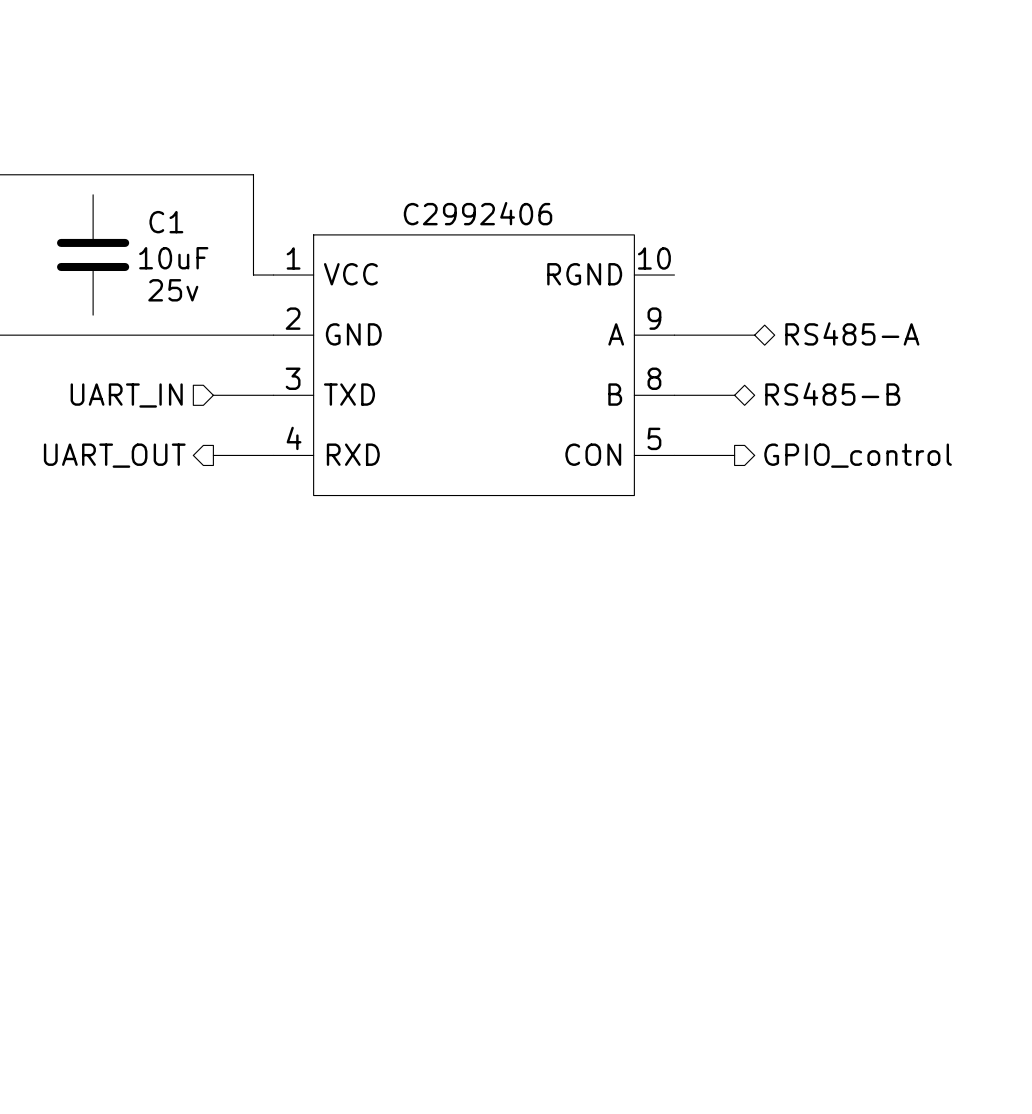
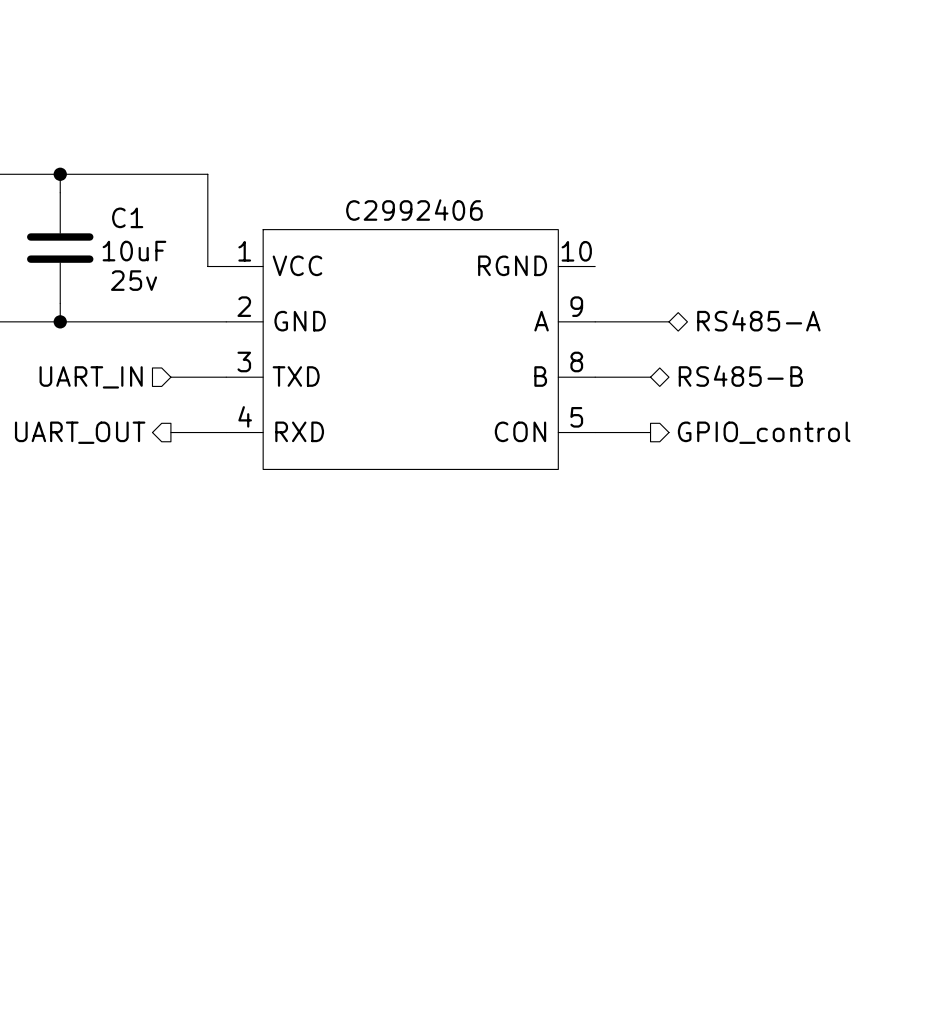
wire: none -> (60, 174) (60, 192)
junction: none -> (60, 174)
wire: none -> (60, 303) (60, 321)
junction: none -> (60, 321)

